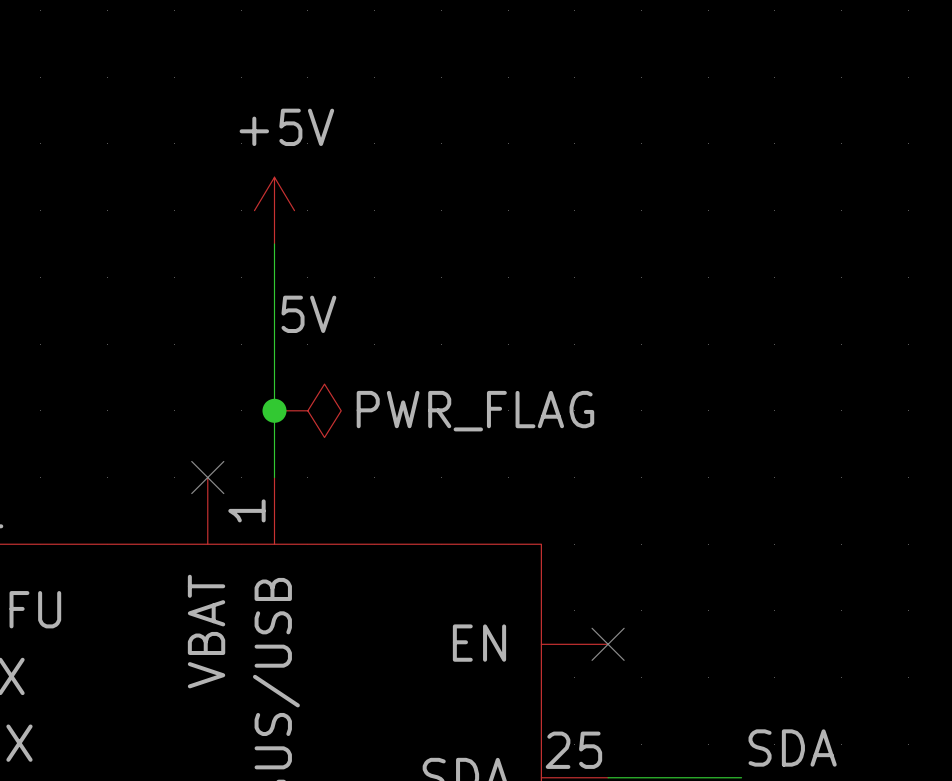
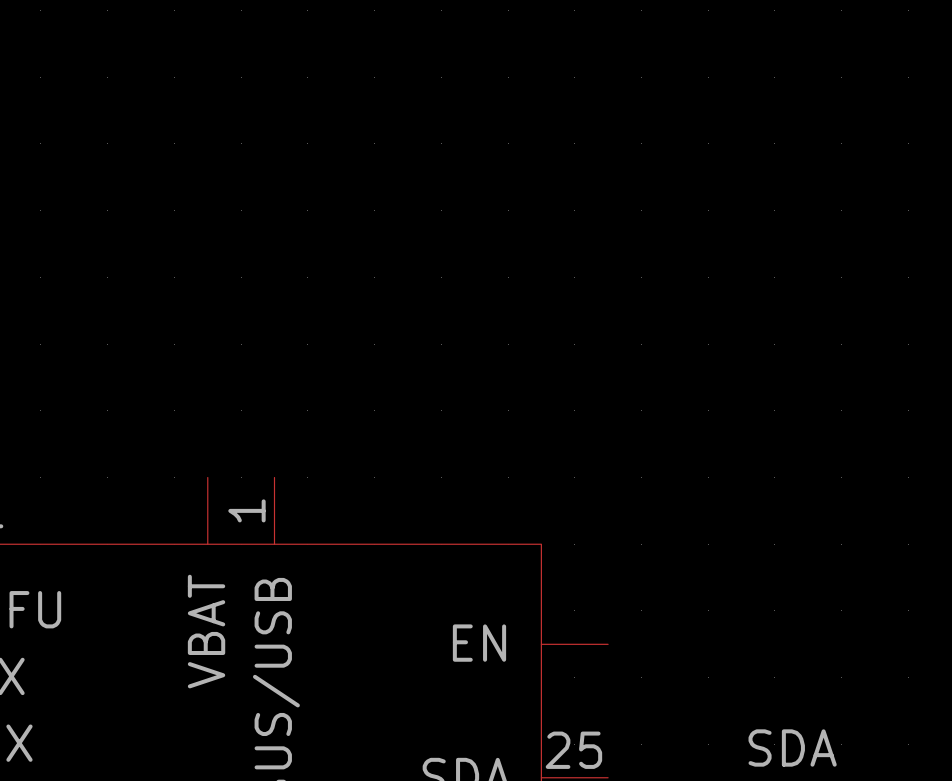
power symbol: +5V (274, 210) -> none
wire: (274, 244) (274, 477) -> none
label: 5V (308, 314) -> none
junction: (274, 410) -> none
power symbol: PWR_FLAG (307, 410) -> none
no-connect mark: (207, 477) -> none
no-connect mark: (608, 644) -> none
wire: (608, 777) (741, 777) -> none

